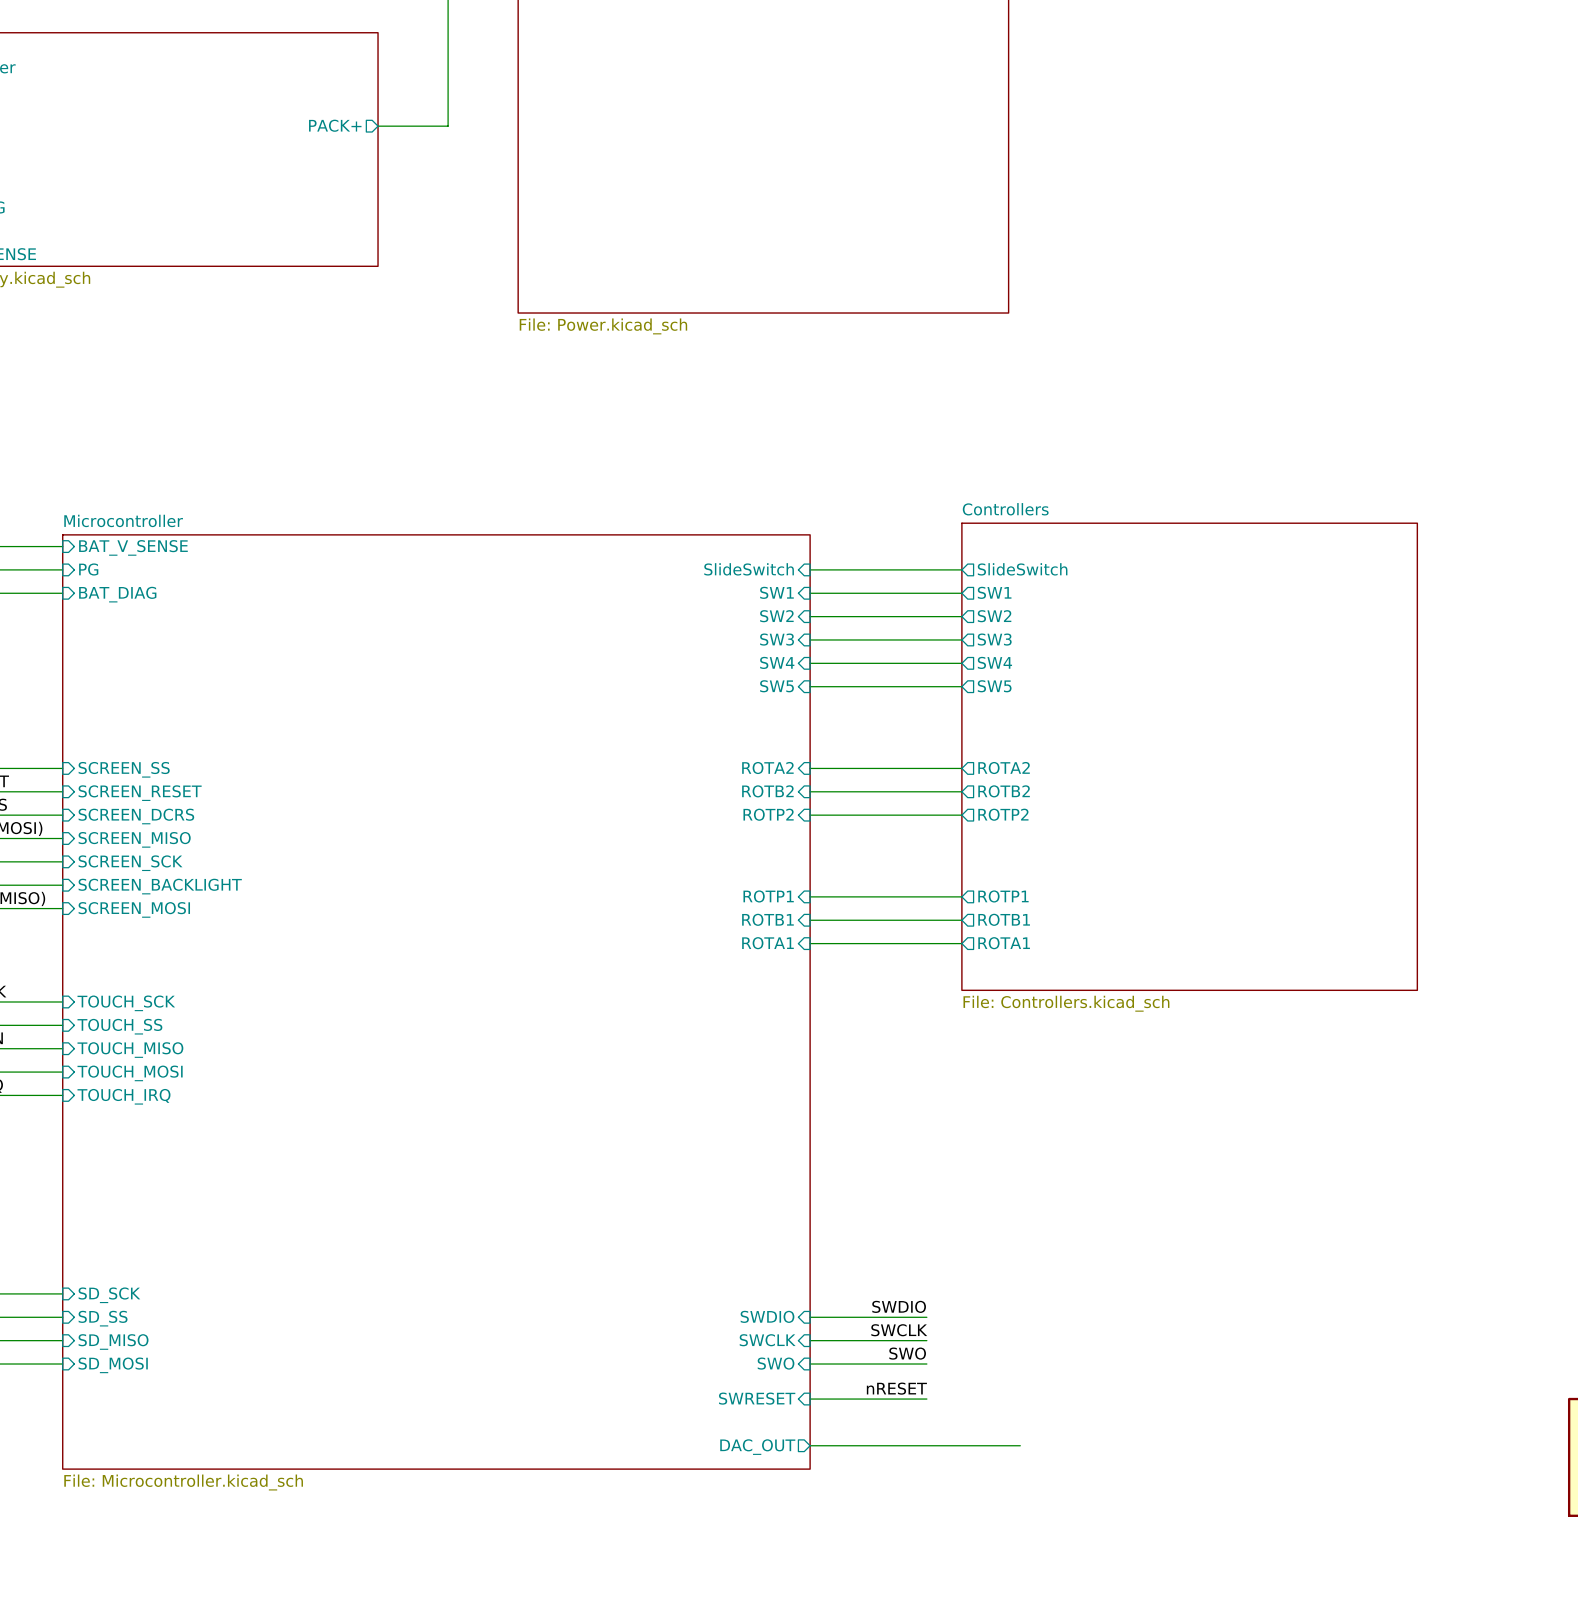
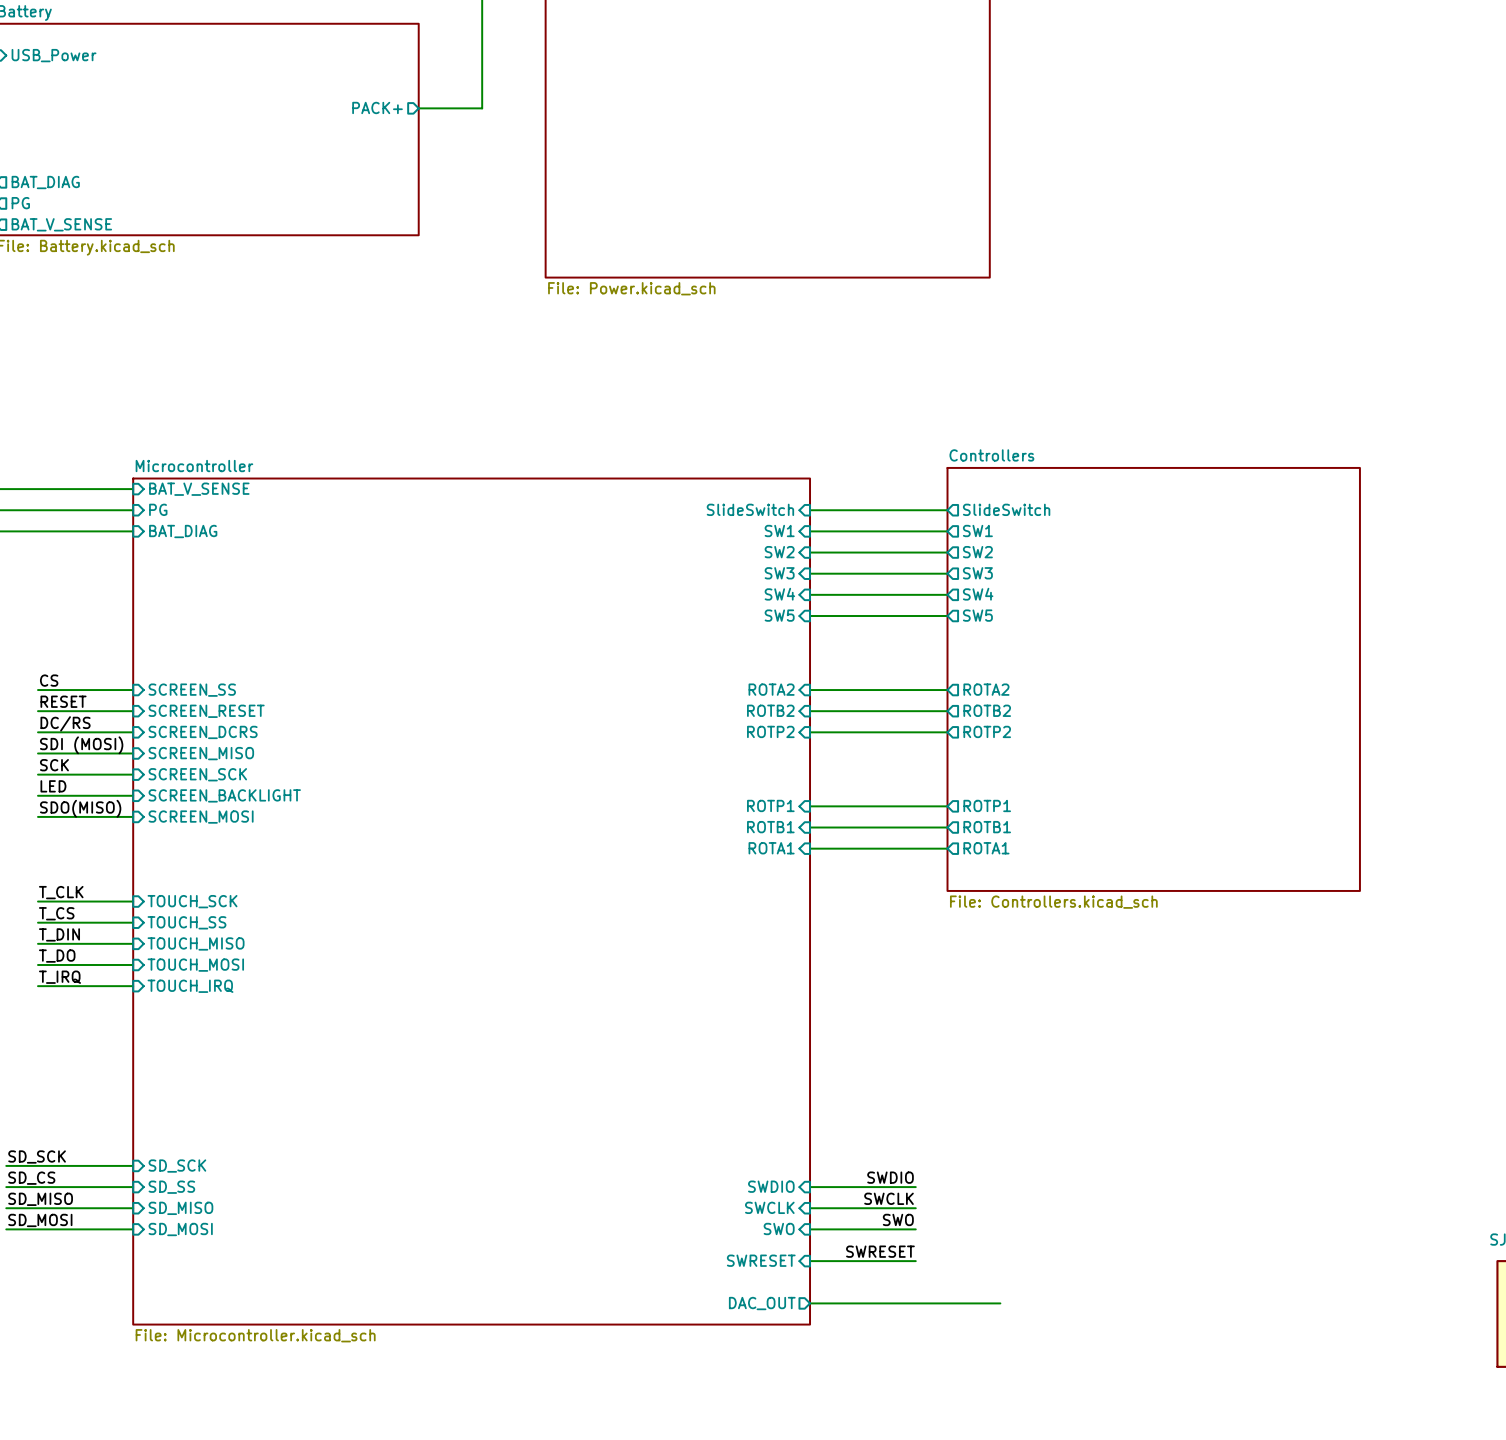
label: nRESET (896, 1388) -> SWRESET (880, 1251)

